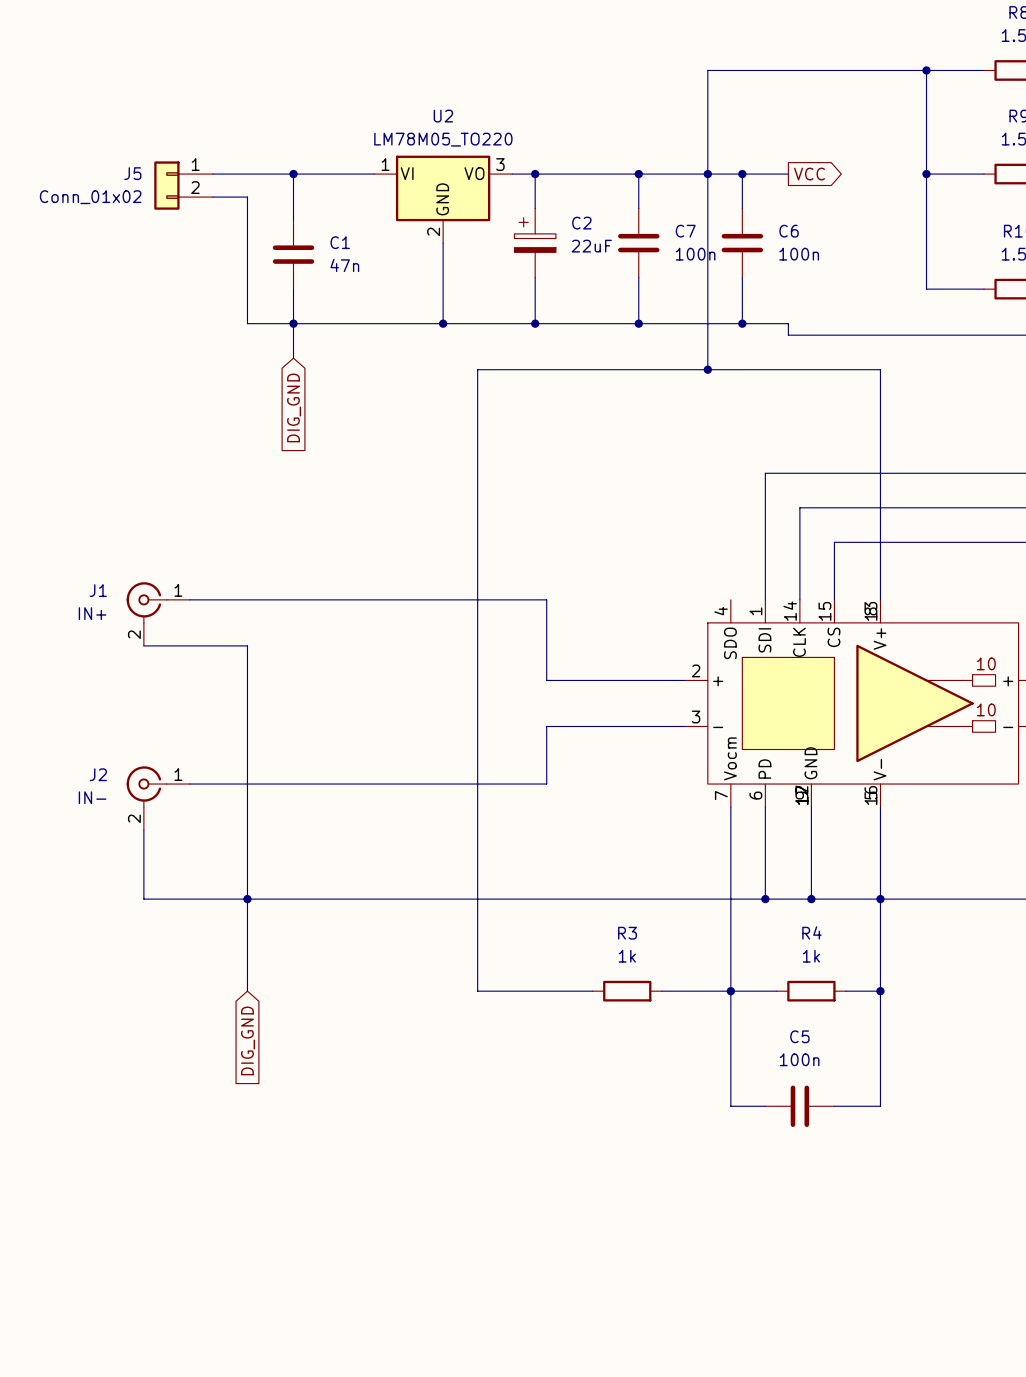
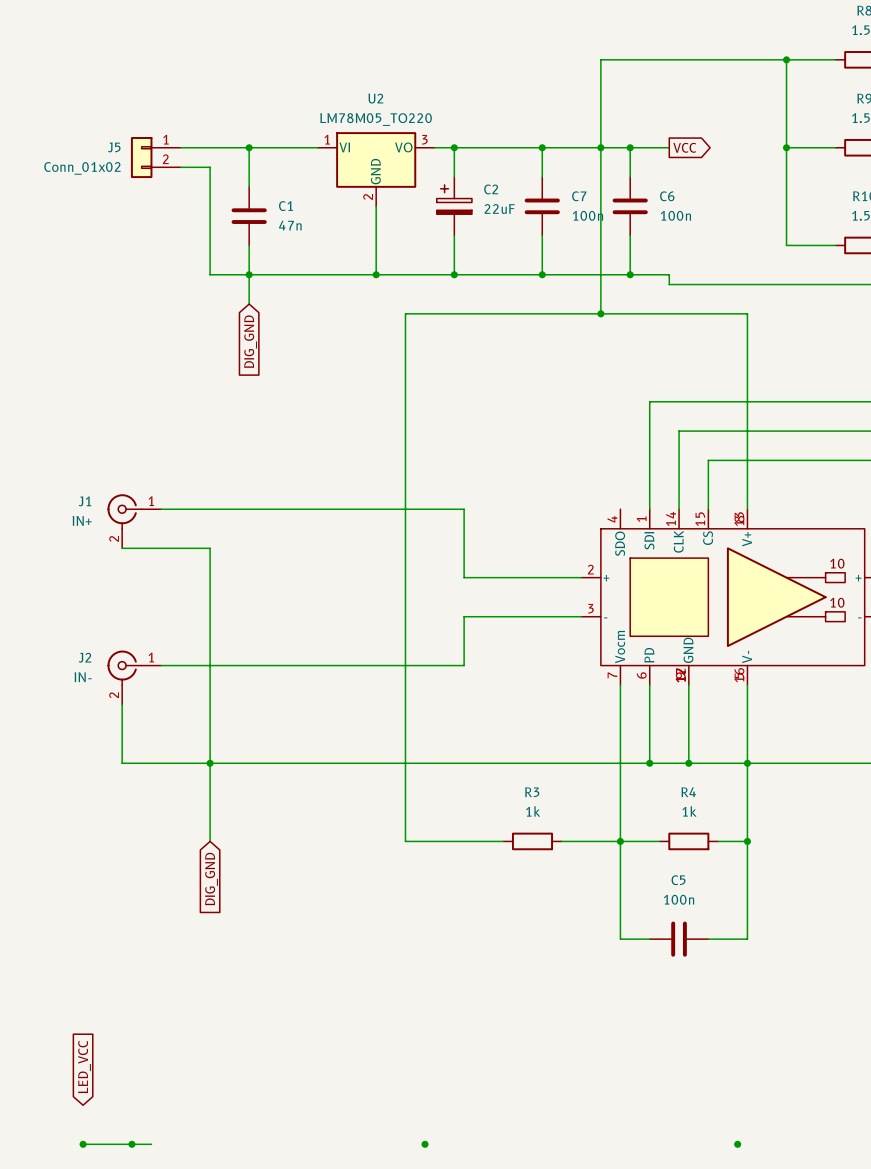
global label: none -> LED_VCC (84, 1066)
wire: none -> (83, 1144) (151, 1144)
junction: none -> (83, 1144)
junction: none -> (131, 1144)
junction: none -> (425, 1144)
junction: none -> (737, 1144)

